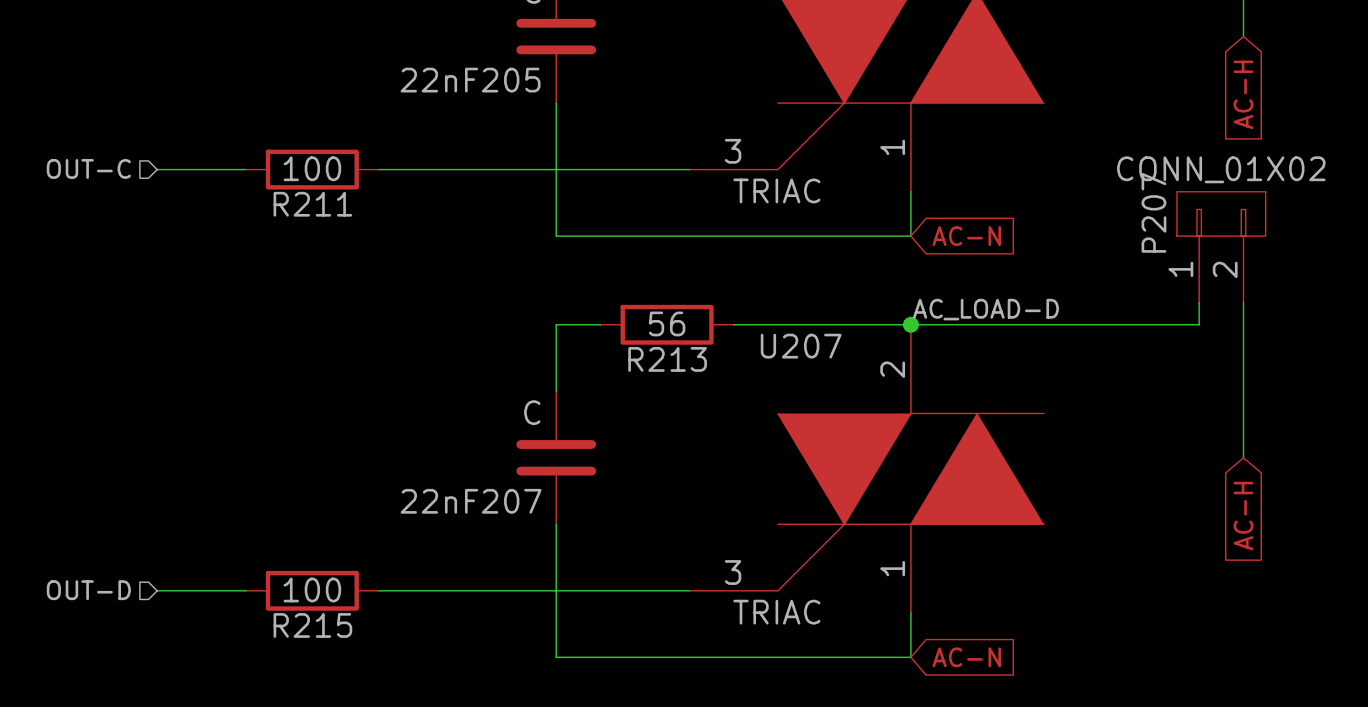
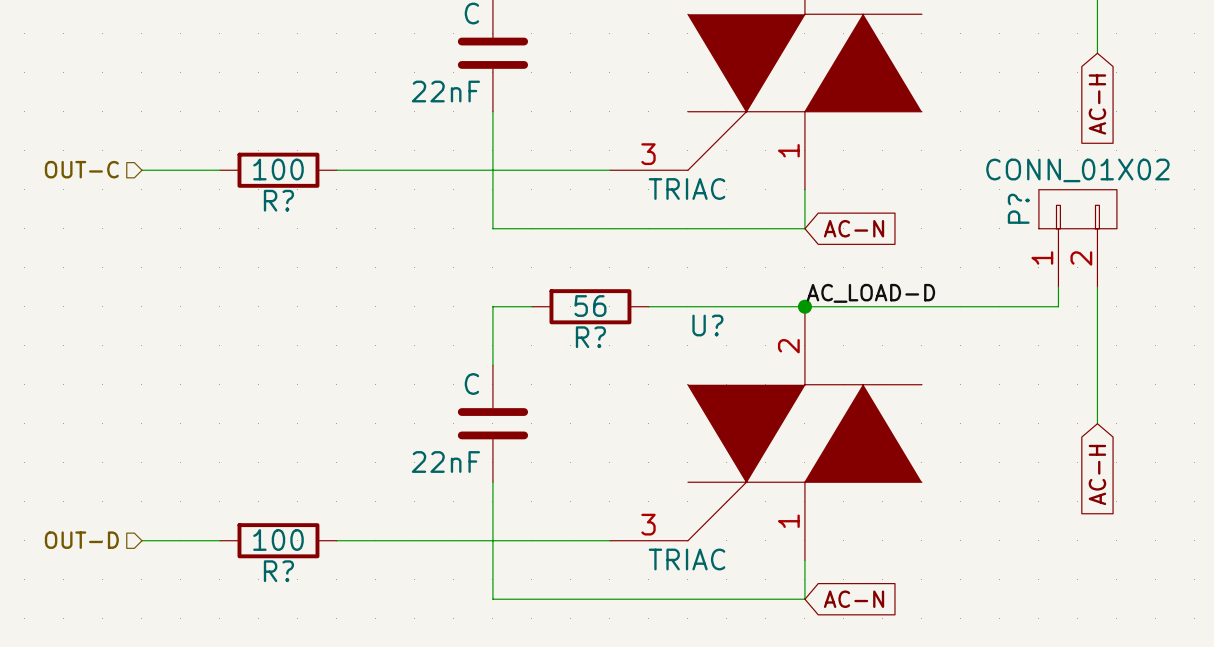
22nF205 name: 22nF205 (470, 80) -> 22nF (445, 91)
R211 name: R211 (312, 204) -> R? (278, 200)
P207 name: P207 (1153, 212) -> P? (1018, 208)
U207 name: U207 (801, 346) -> U? (707, 325)
R213 name: R213 (667, 359) -> R? (590, 337)
22nF207 name: 22nF207 (471, 501) -> 22nF (445, 462)
R215 name: R215 (312, 625) -> R? (278, 571)

